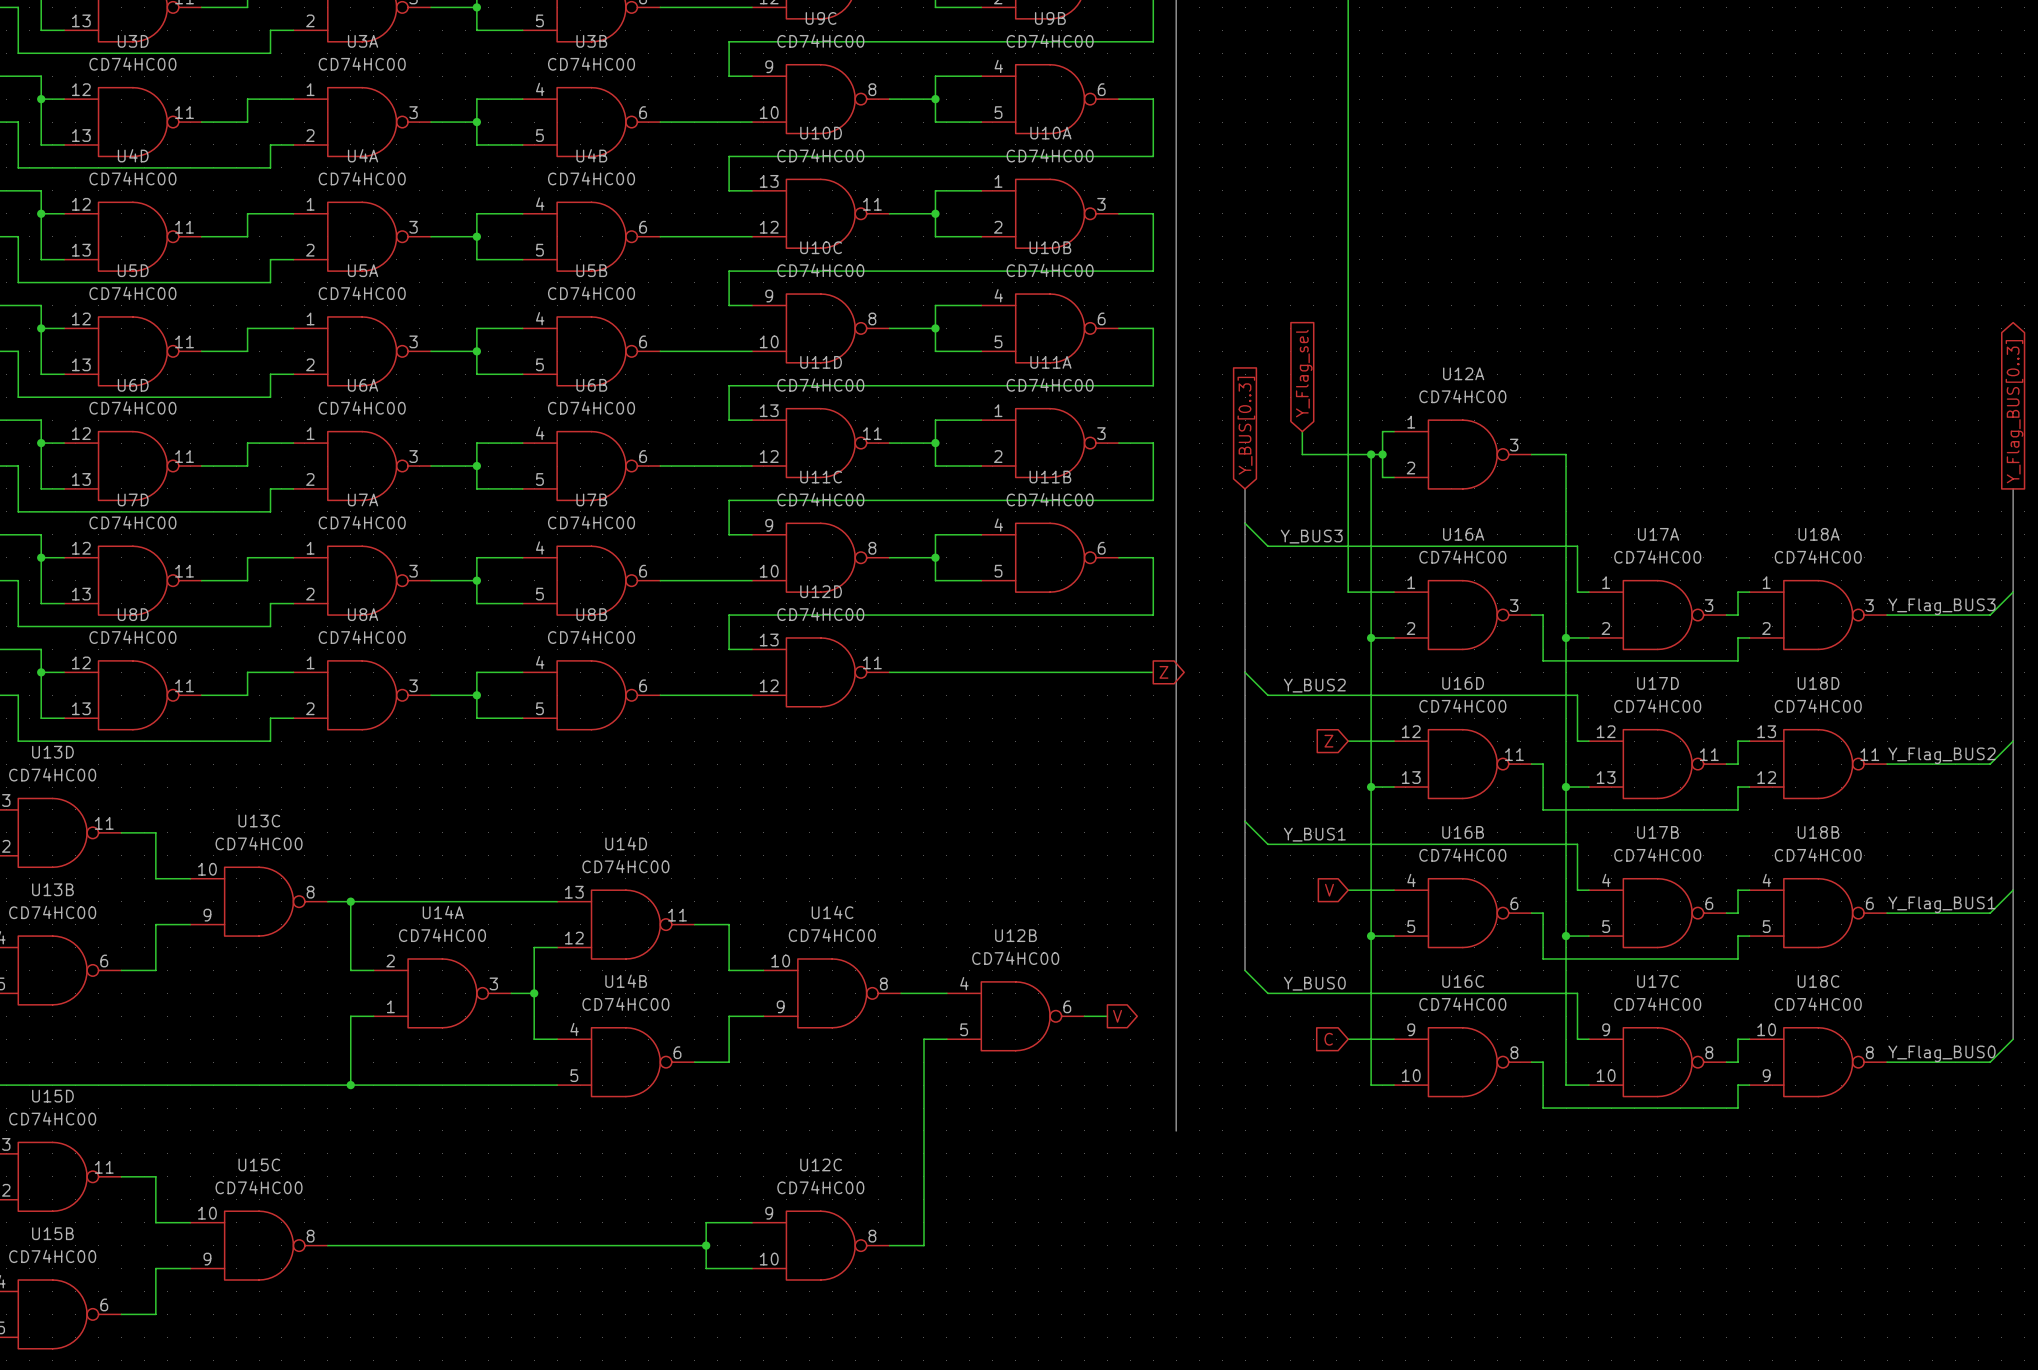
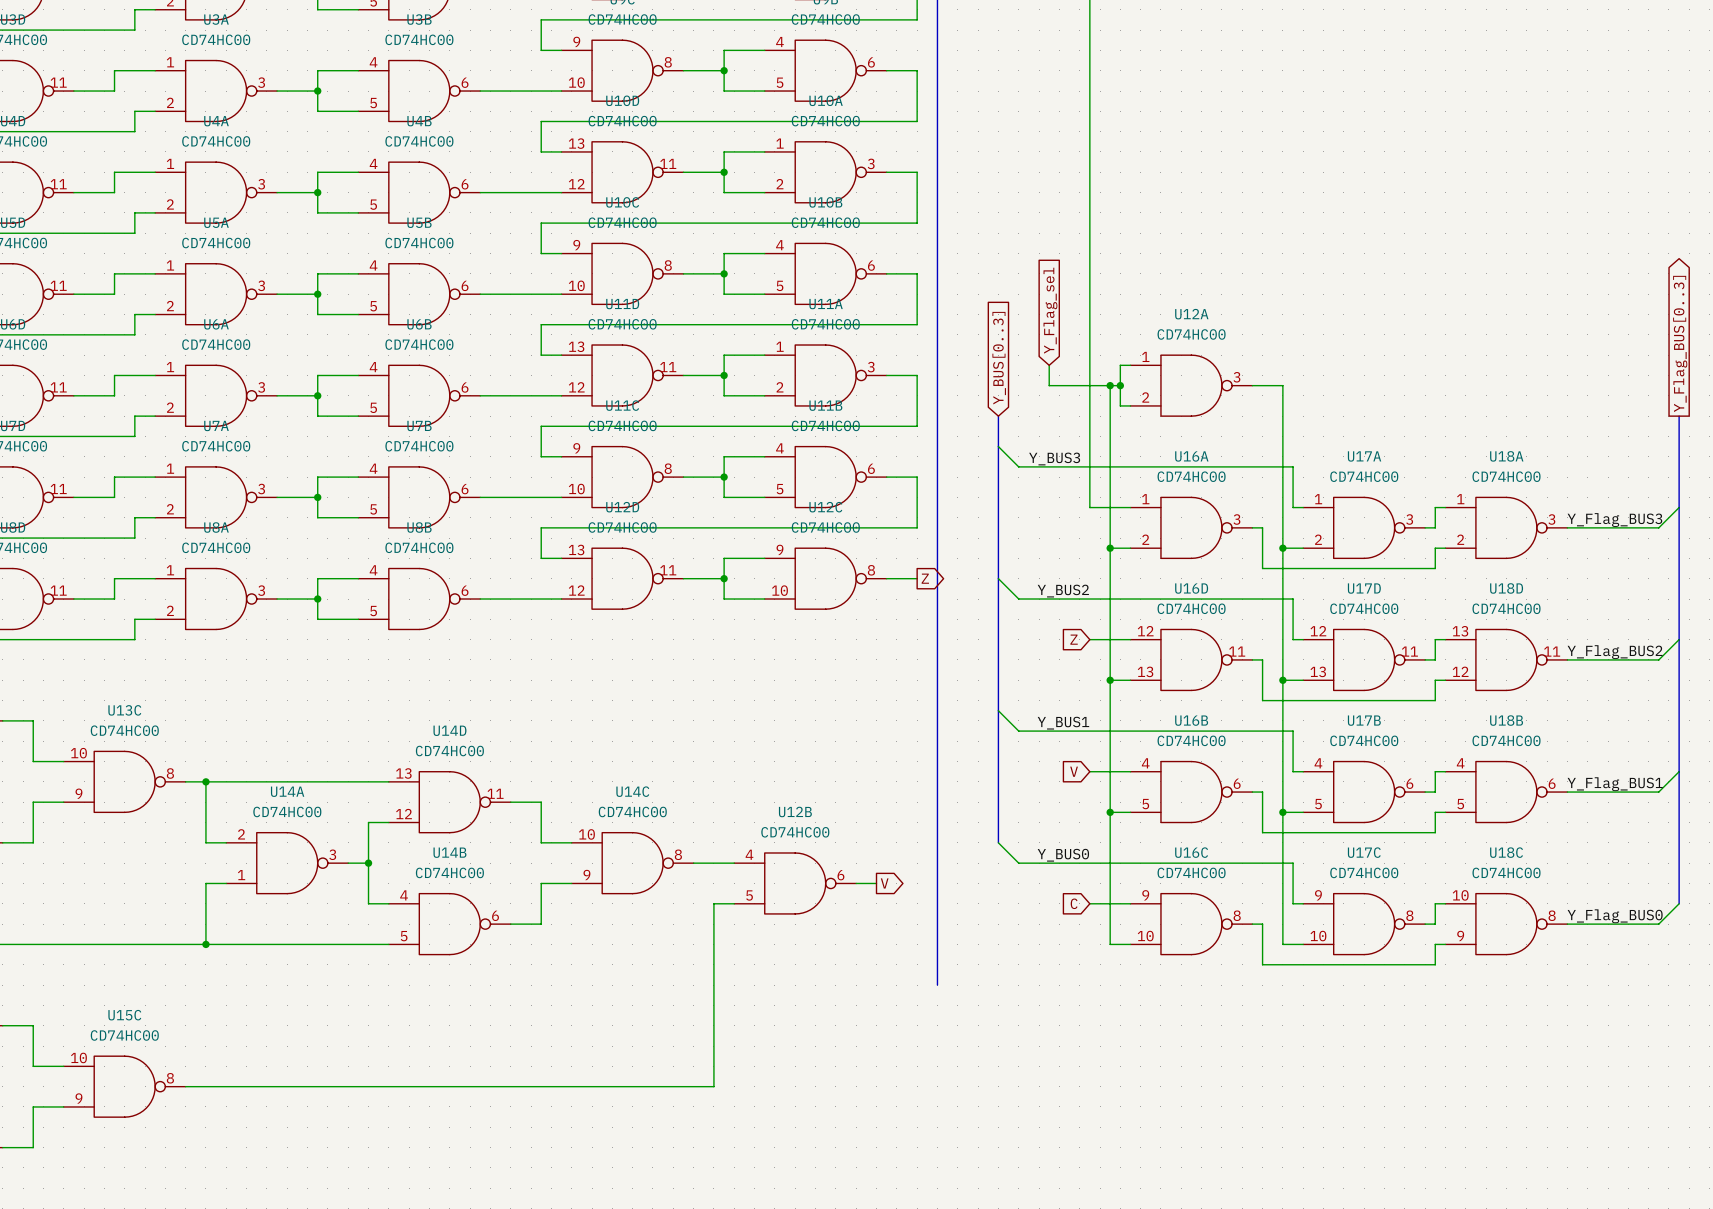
wire: none -> (764, 558) (724, 558) (724, 599) (764, 599)
wire: (935, 672) (1118, 672) -> none
junction: none -> (724, 578)
wire: (752, 1222) (706, 1222) (706, 1268) (752, 1268) -> none
wire: none -> (520, 1086) (683, 1086)
junction: (706, 1245) -> none
U12C position: (820, 1245) -> (825, 578)

